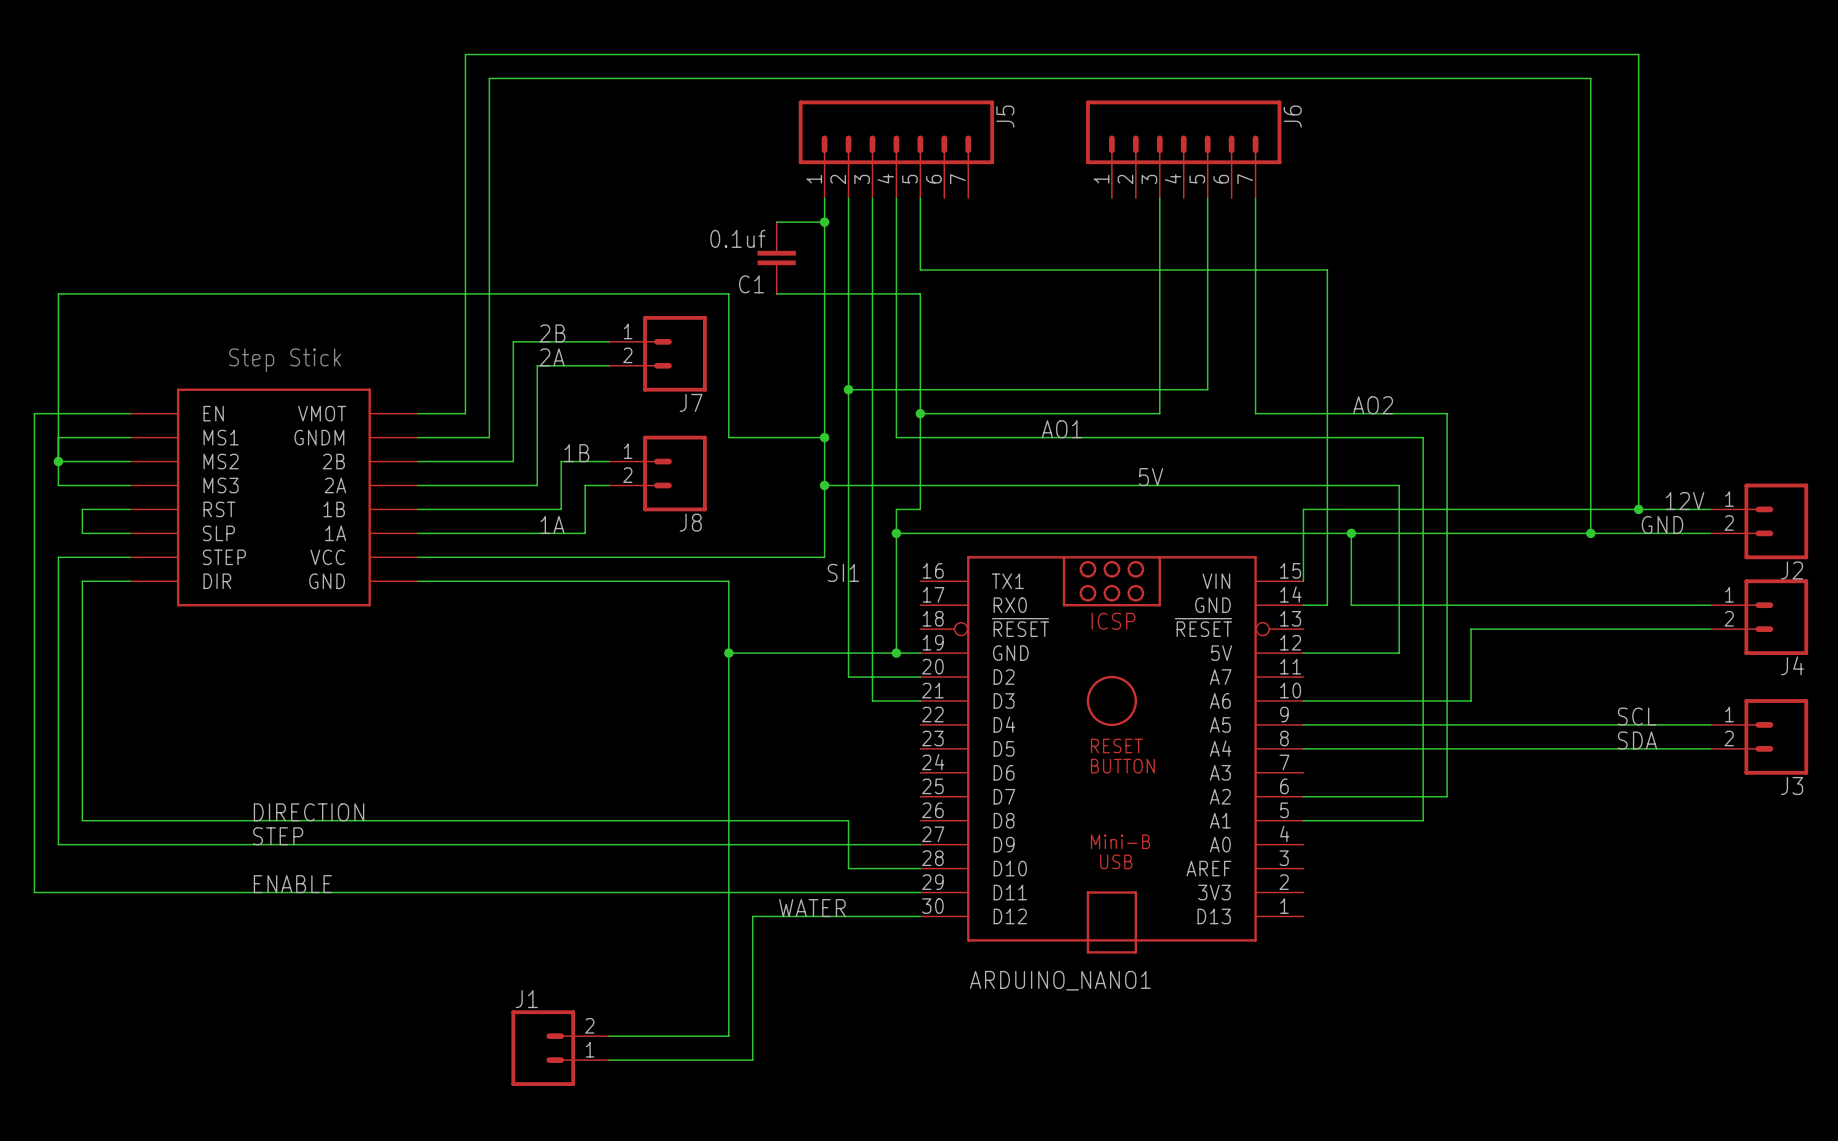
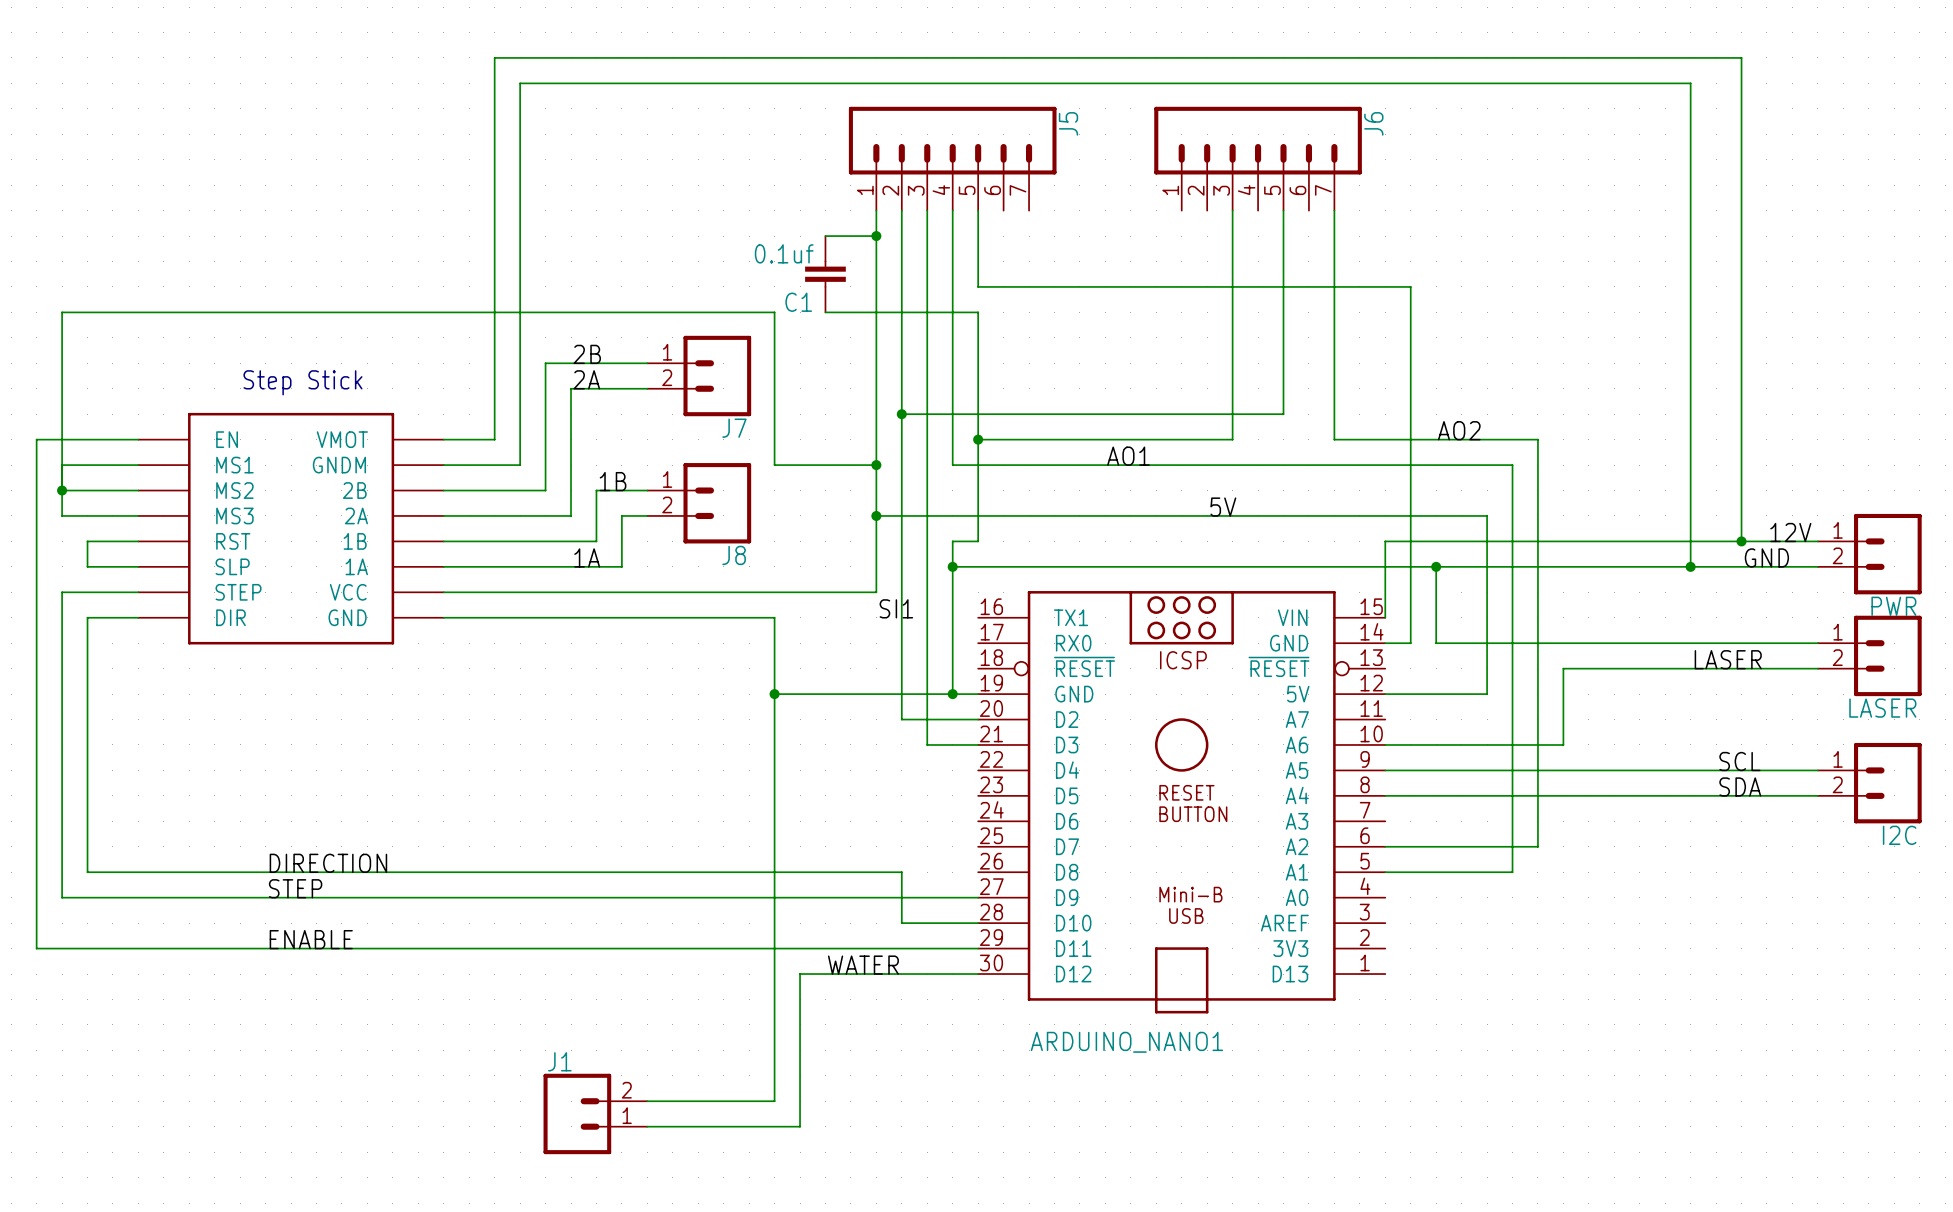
J2 name: J2 (1792, 570) -> PWR (1893, 606)
label: none -> LASER (1728, 659)
J4 name: J4 (1792, 665) -> LASER (1882, 708)
J3 name: J3 (1792, 785) -> I2C (1899, 835)

